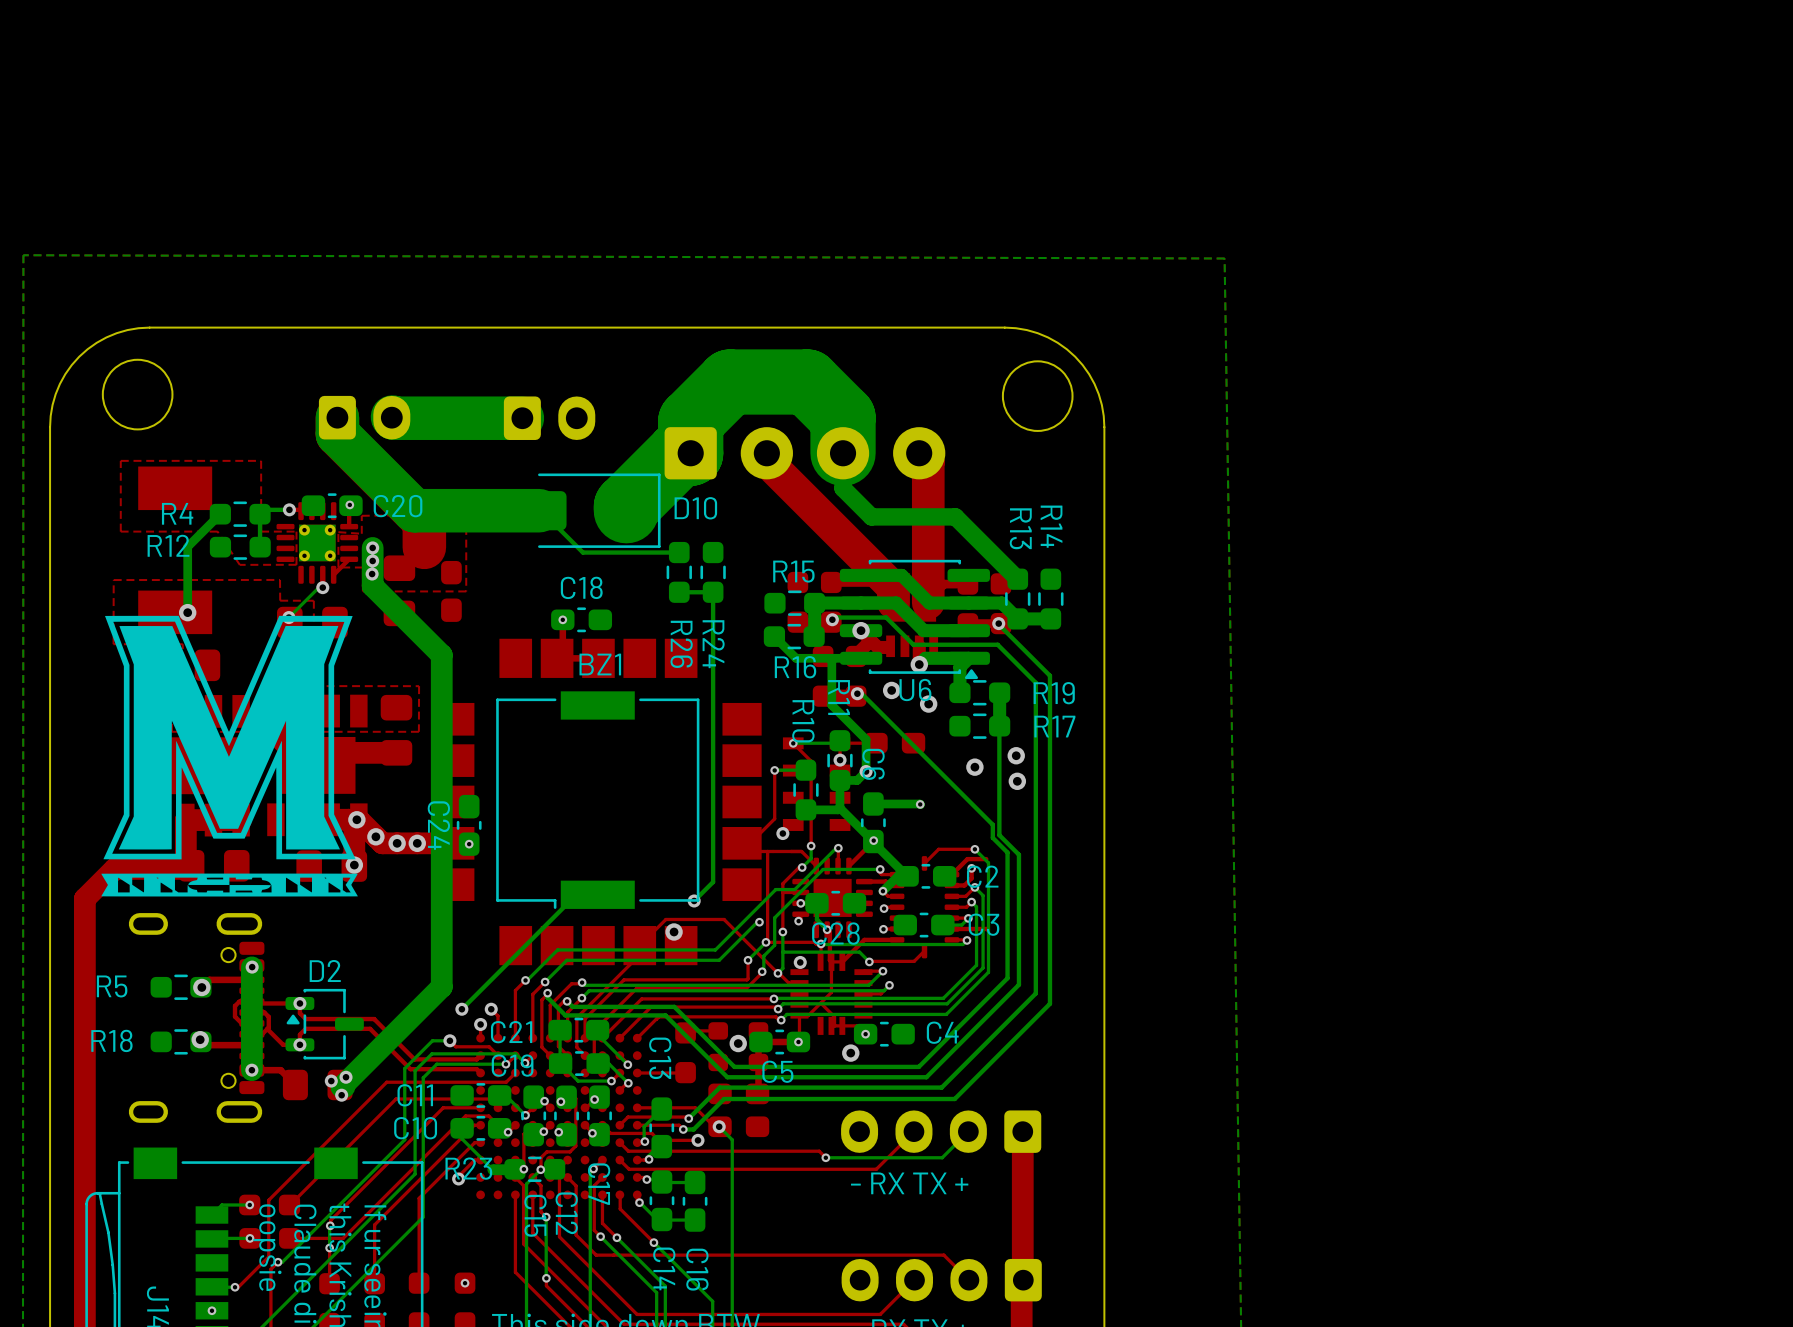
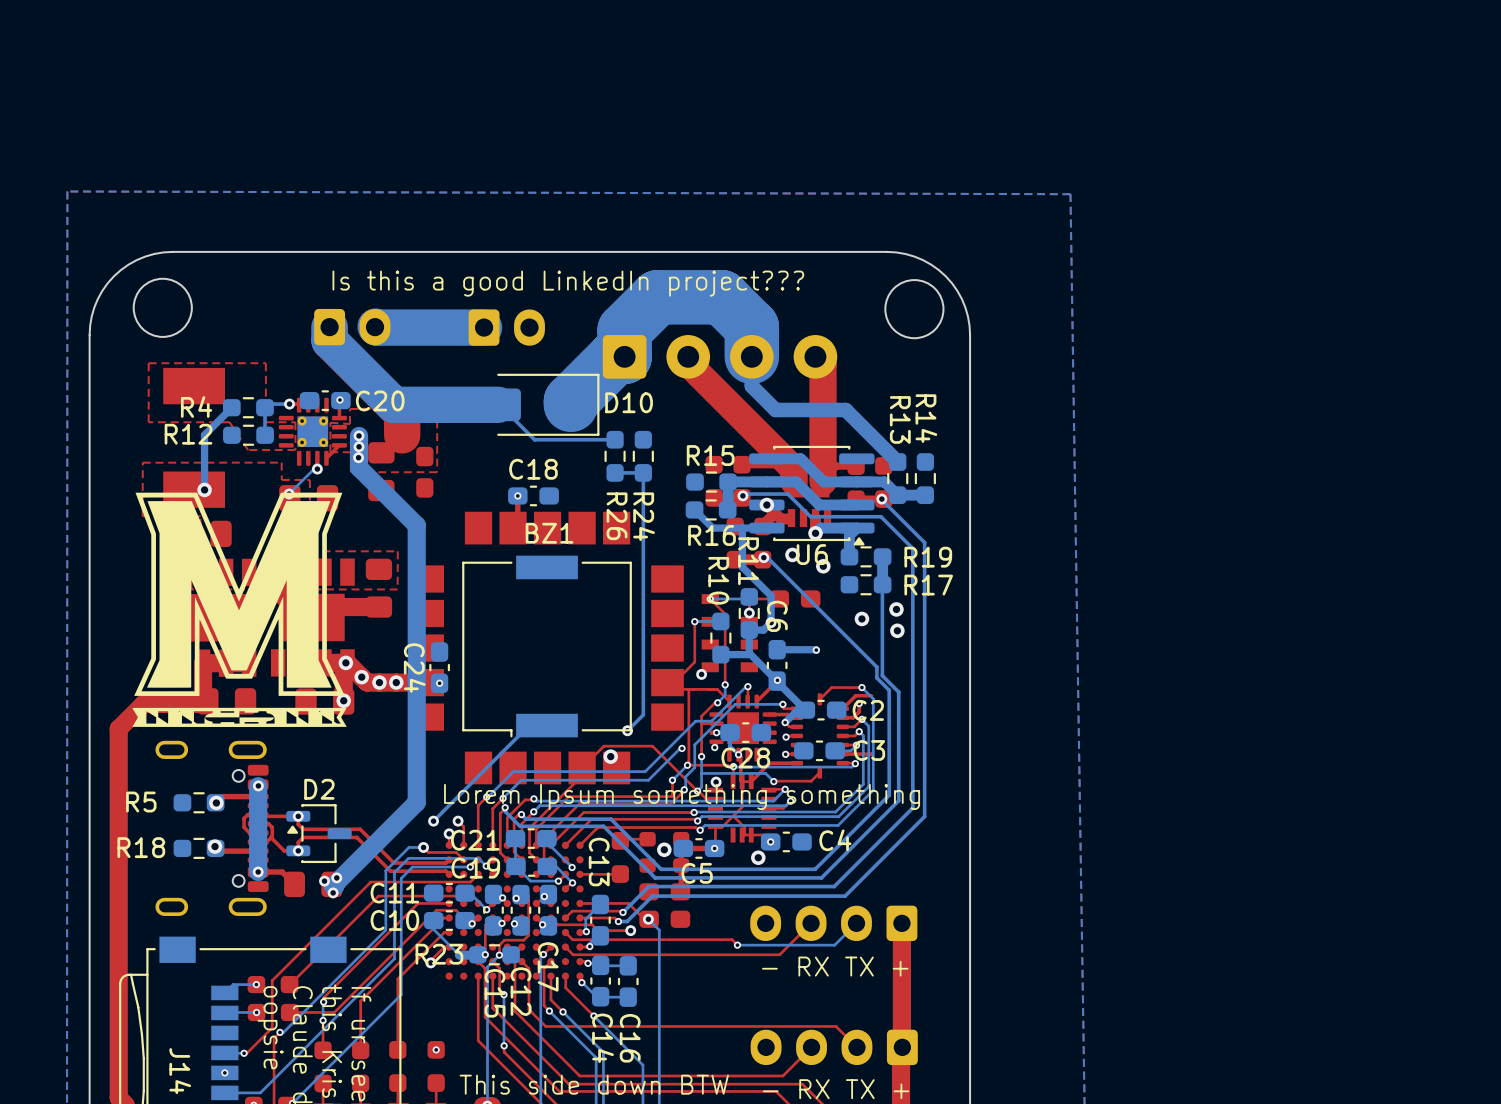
text: none -> Is this a good LinkedIn project??? (568, 283)
text: none -> Lorem Ipsum something something (682, 796)

